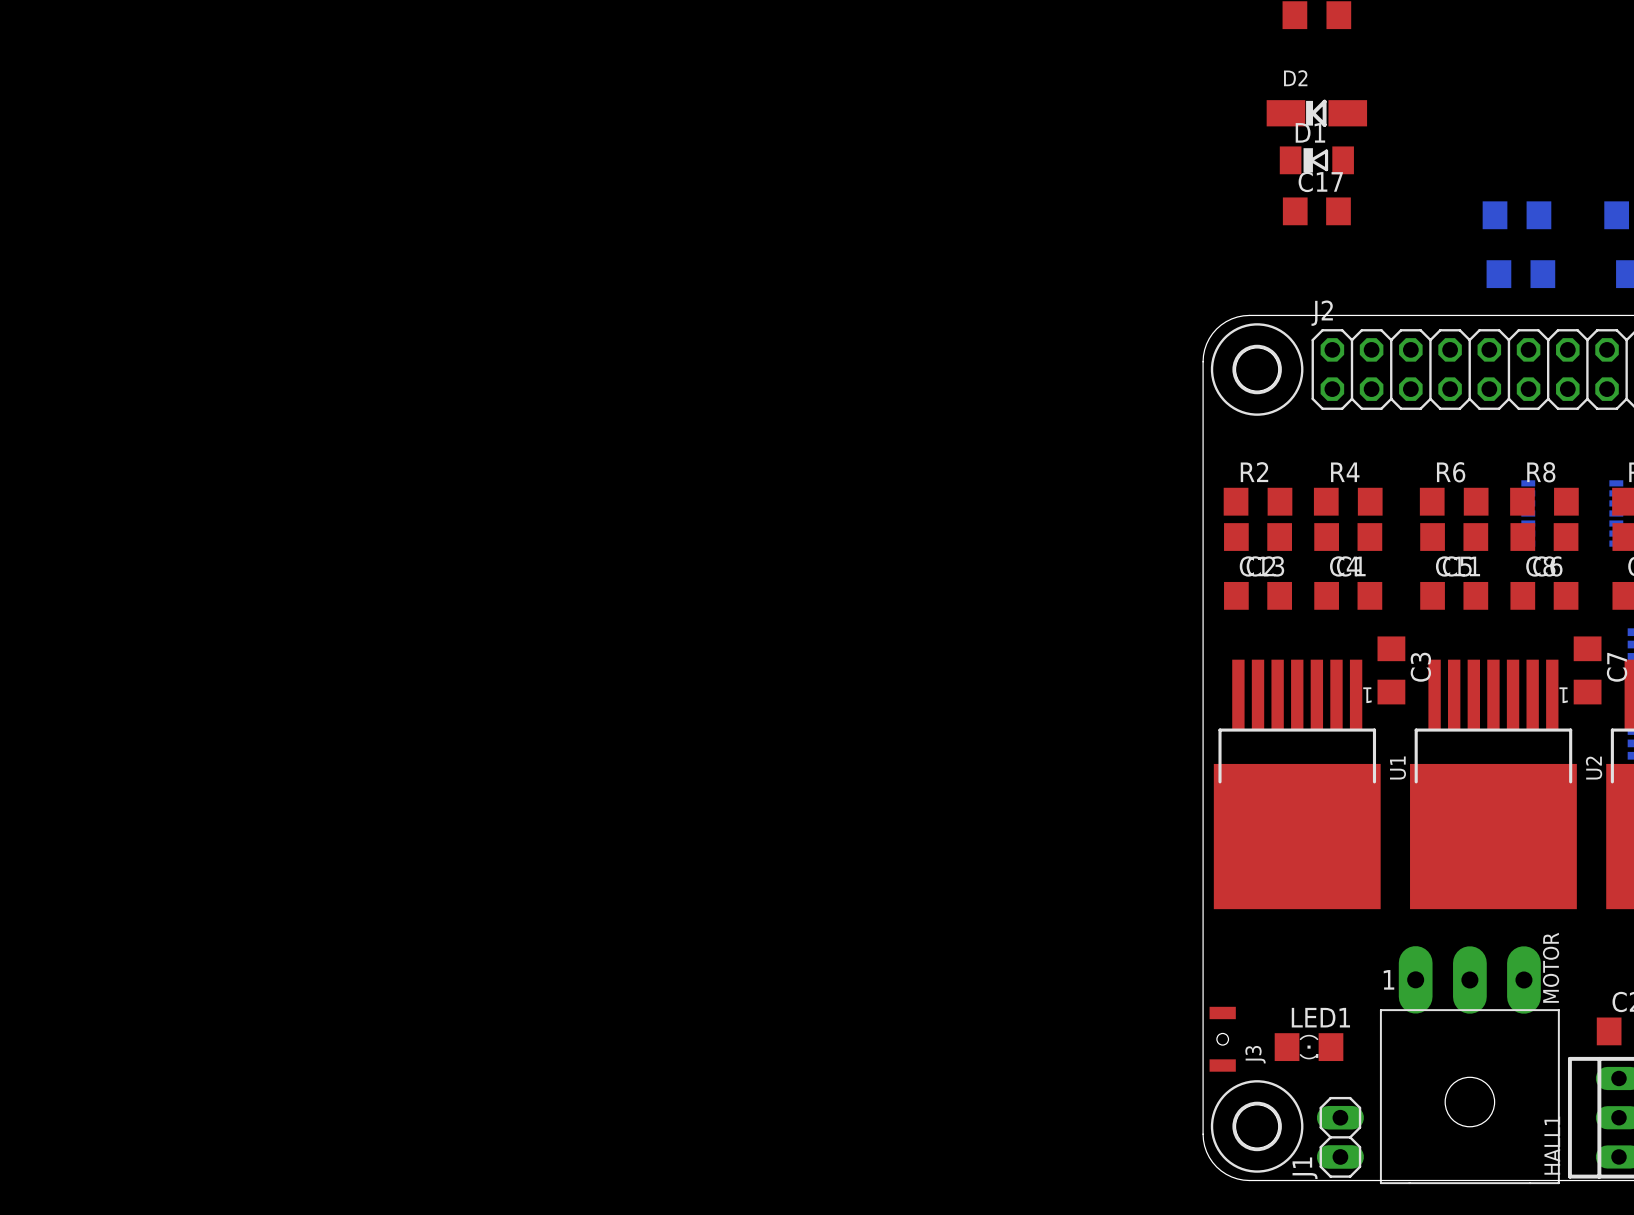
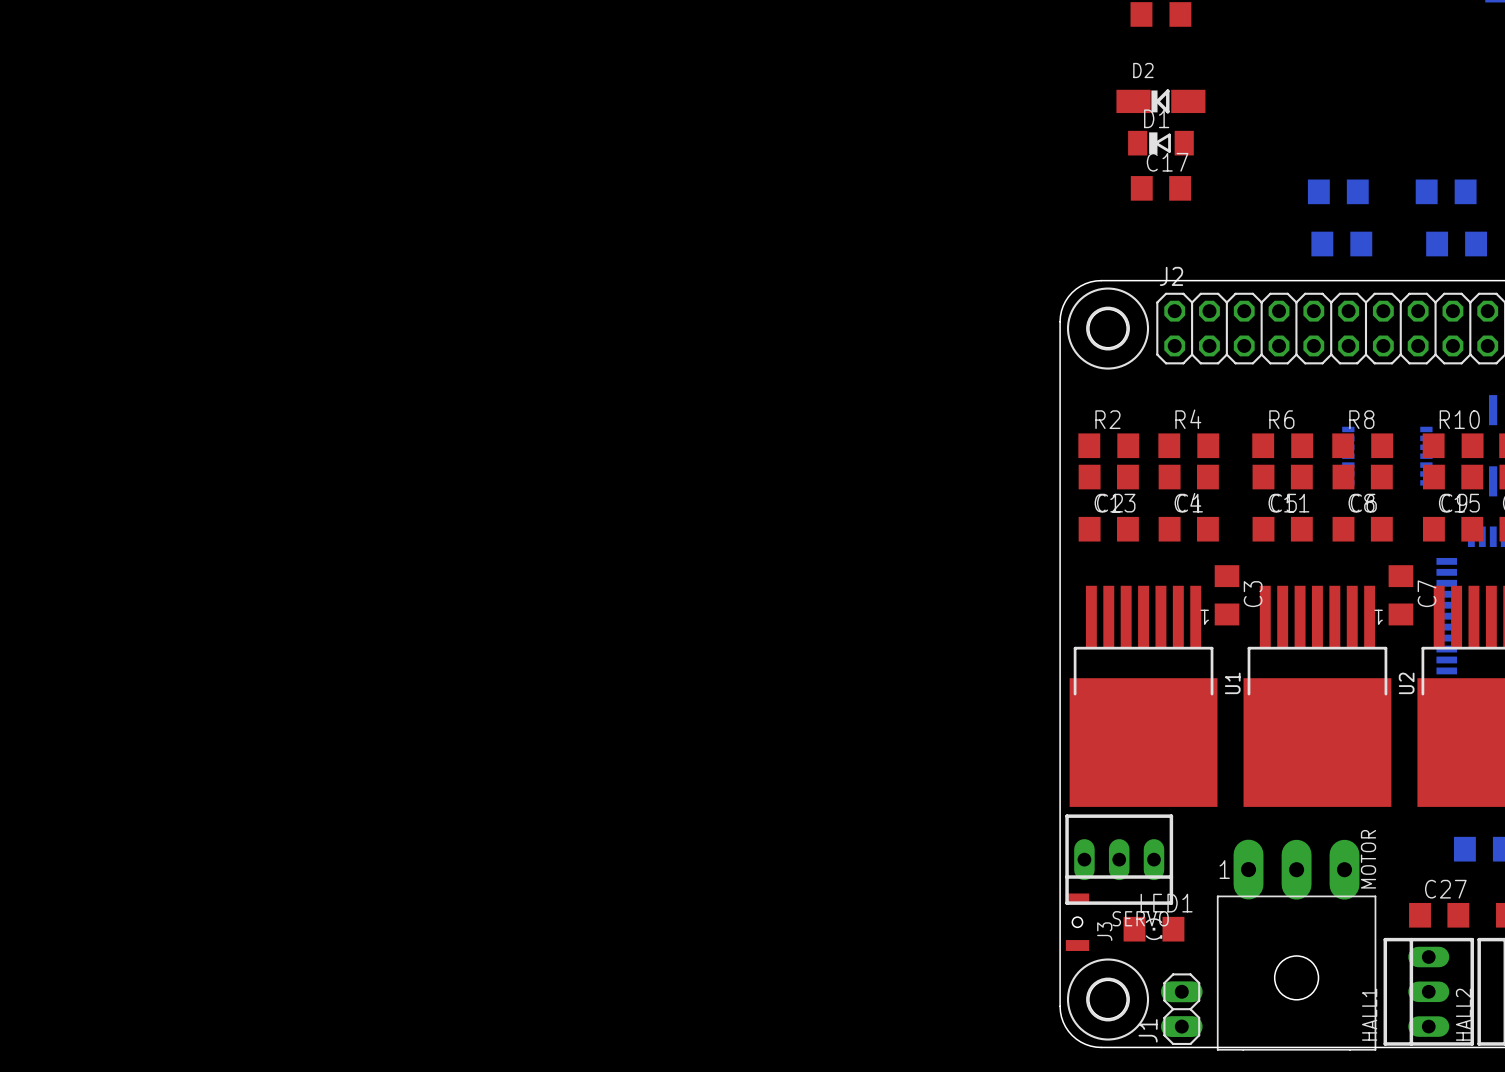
SERVO: none -> (1119, 859)

